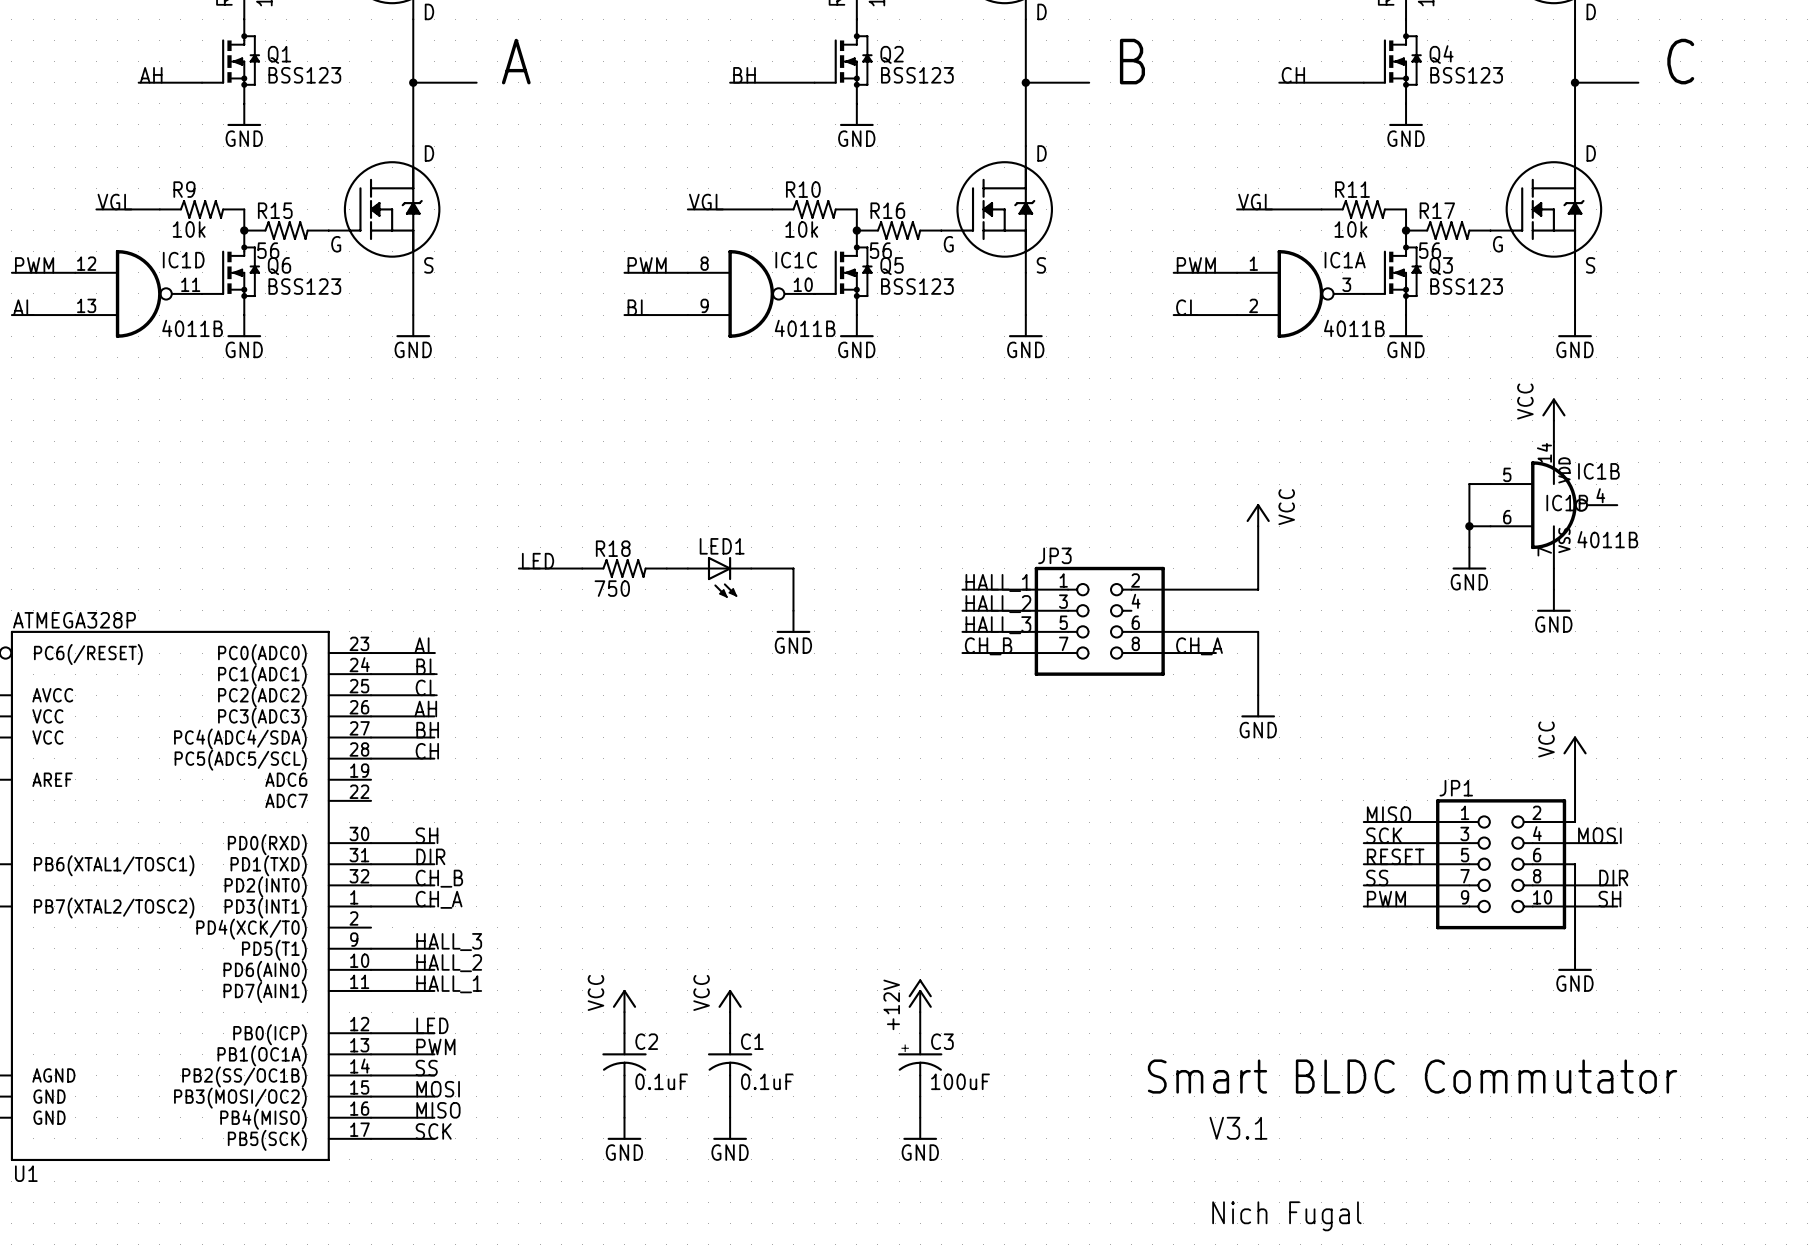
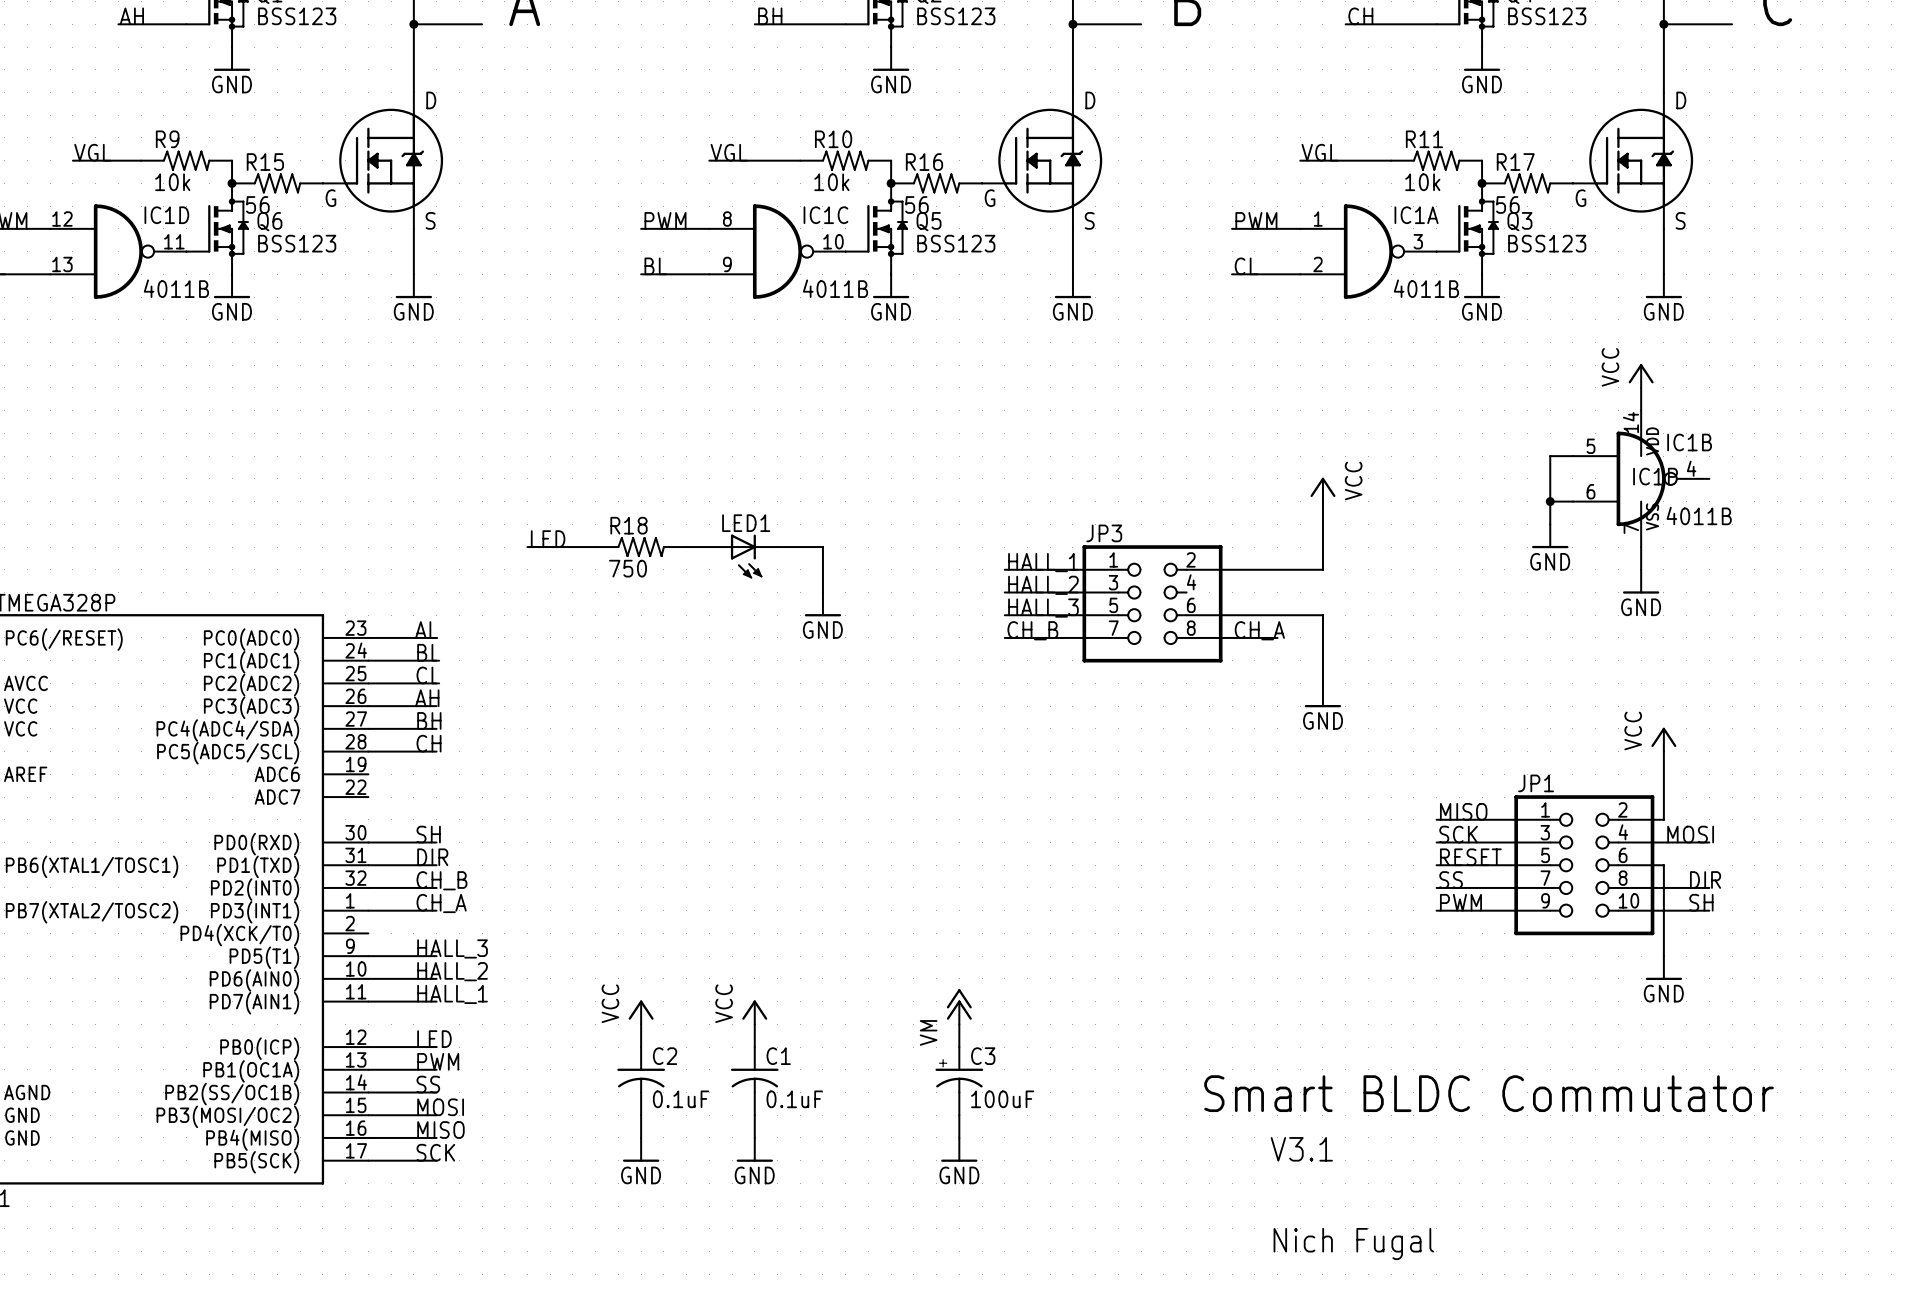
power symbol: +12V (920, 995) -> VM (959, 1006)

